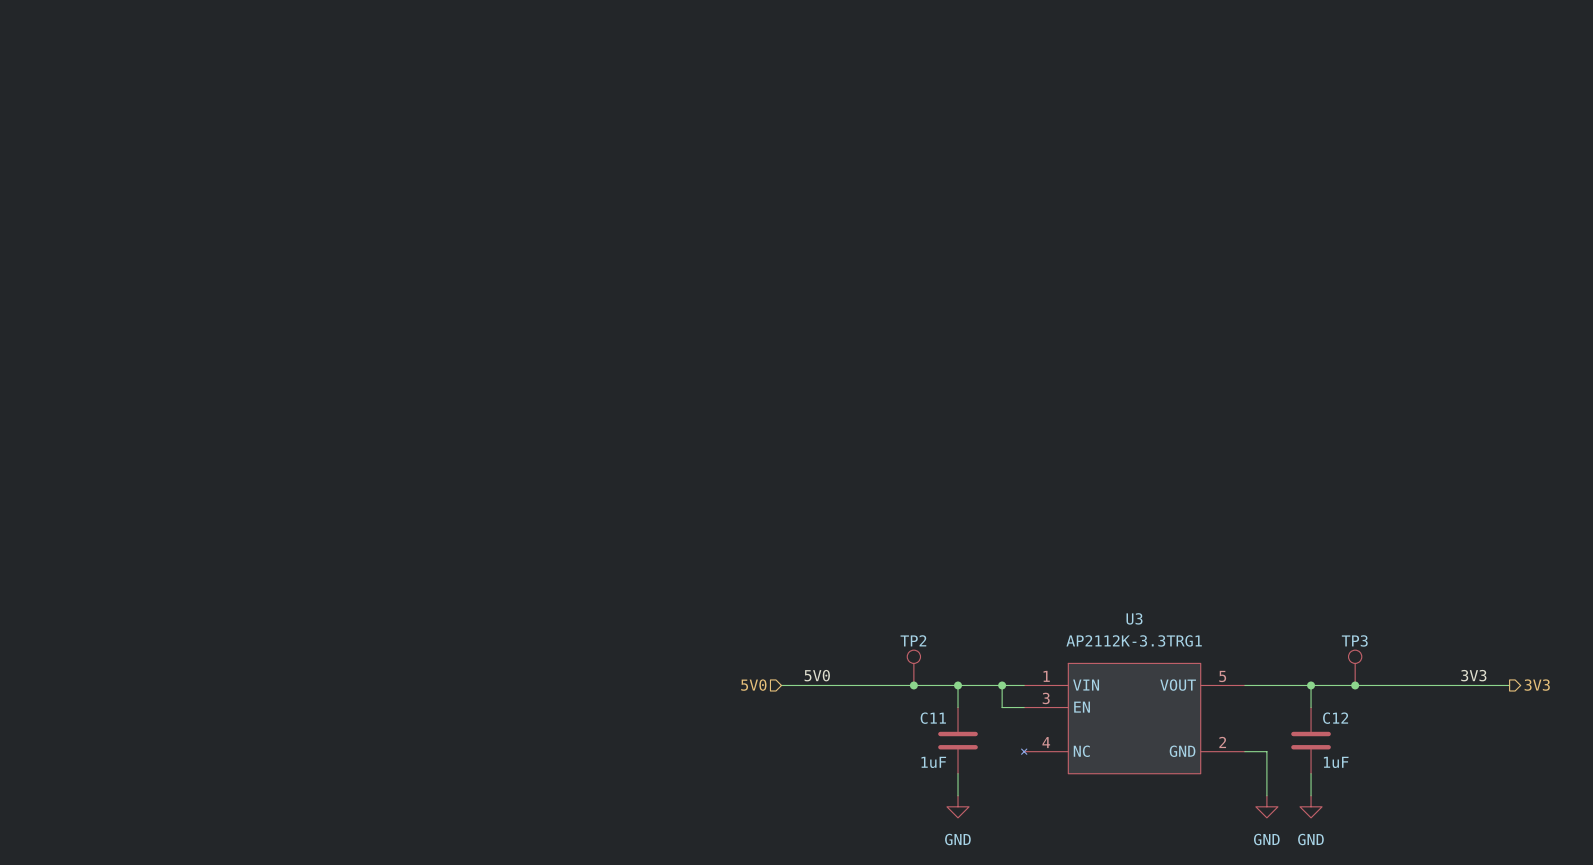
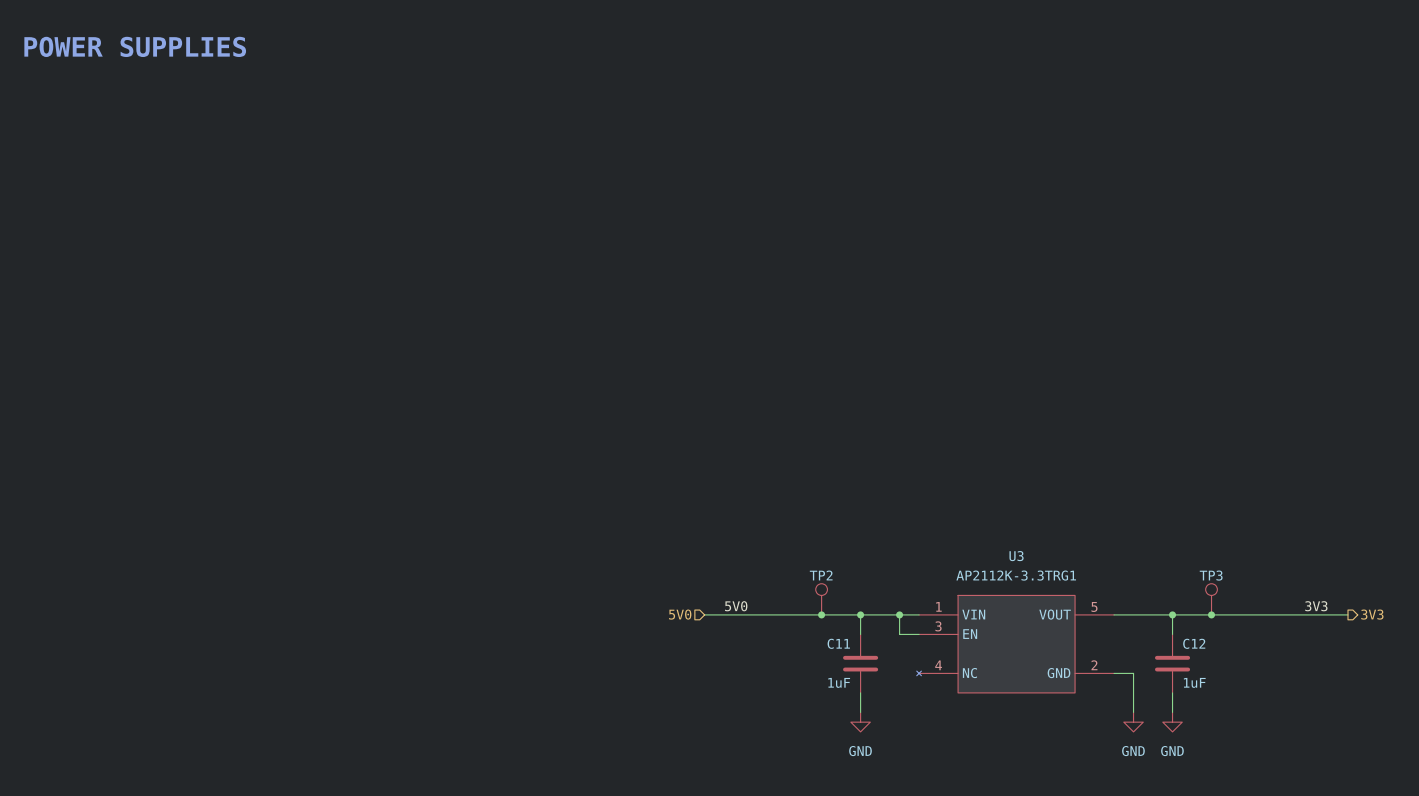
text: none -> POWER SUPPLIES (135, 46)

